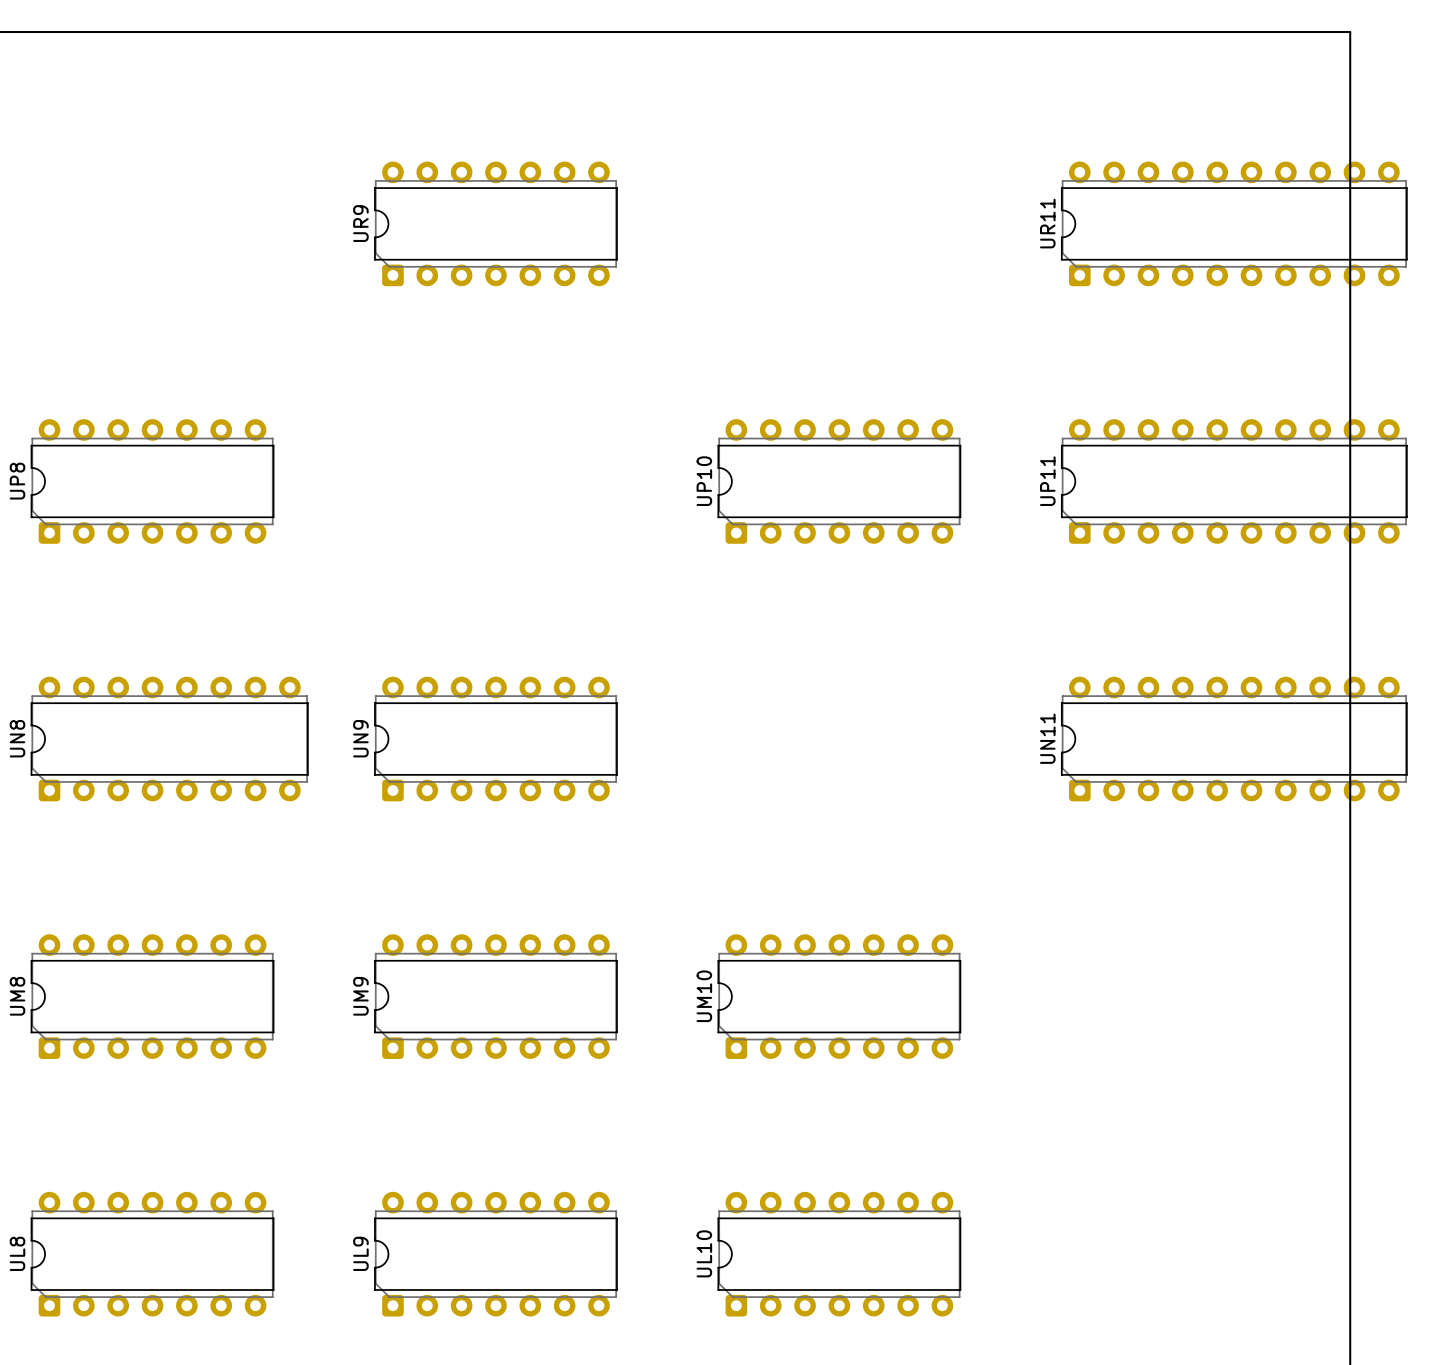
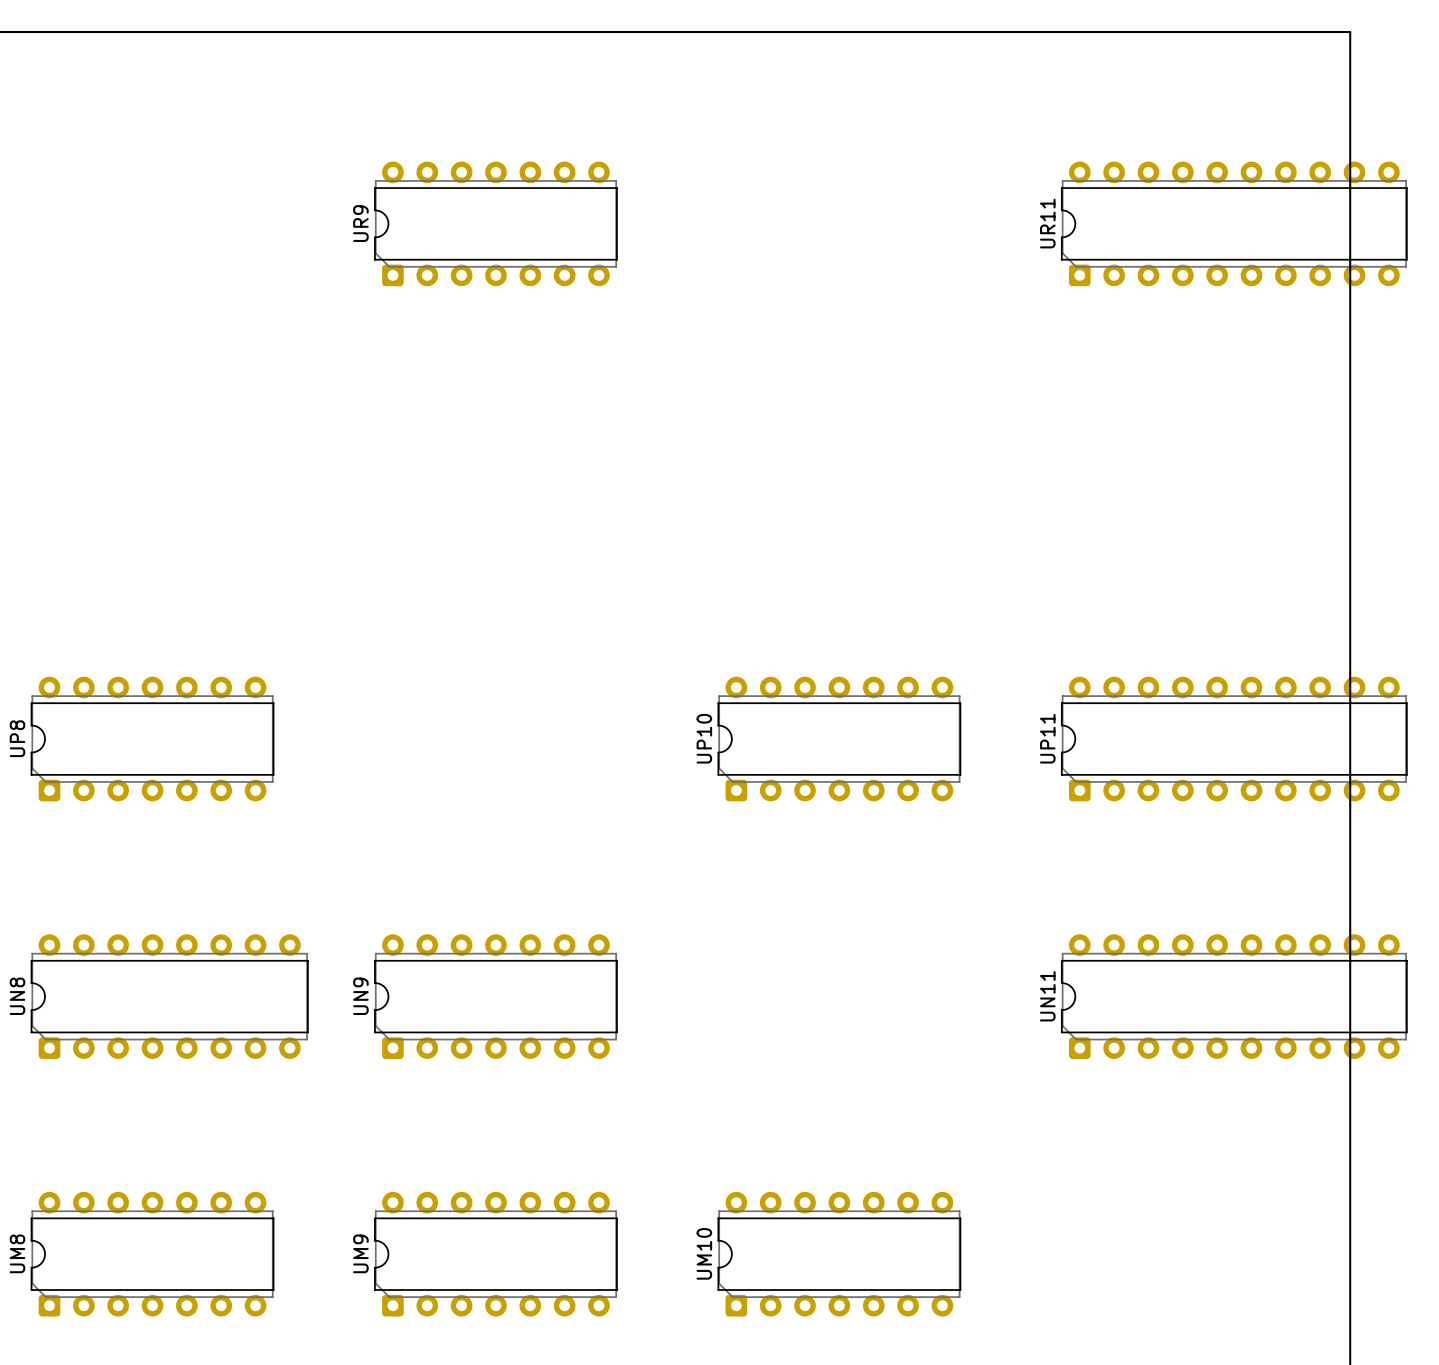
UP8 position: (152, 481) -> (152, 739)
UP10 position: (839, 481) -> (839, 739)
UP11: (1234, 481) -> none
UN11 name: UN11 (1047, 738) -> UP11 (1047, 738)
UN8 position: (169, 739) -> (169, 996)
UN9: (495, 739) -> none
UM8: (152, 996) -> none
UM9 name: UM9 (360, 996) -> UN9 (360, 996)
UM10: (839, 996) -> none
UN11: none -> (1234, 996)
UL8 name: UL8 (17, 1253) -> UM8 (17, 1253)
UL9 name: UL9 (360, 1253) -> UM9 (360, 1253)
UL10 name: UL10 (704, 1253) -> UM10 (704, 1253)

